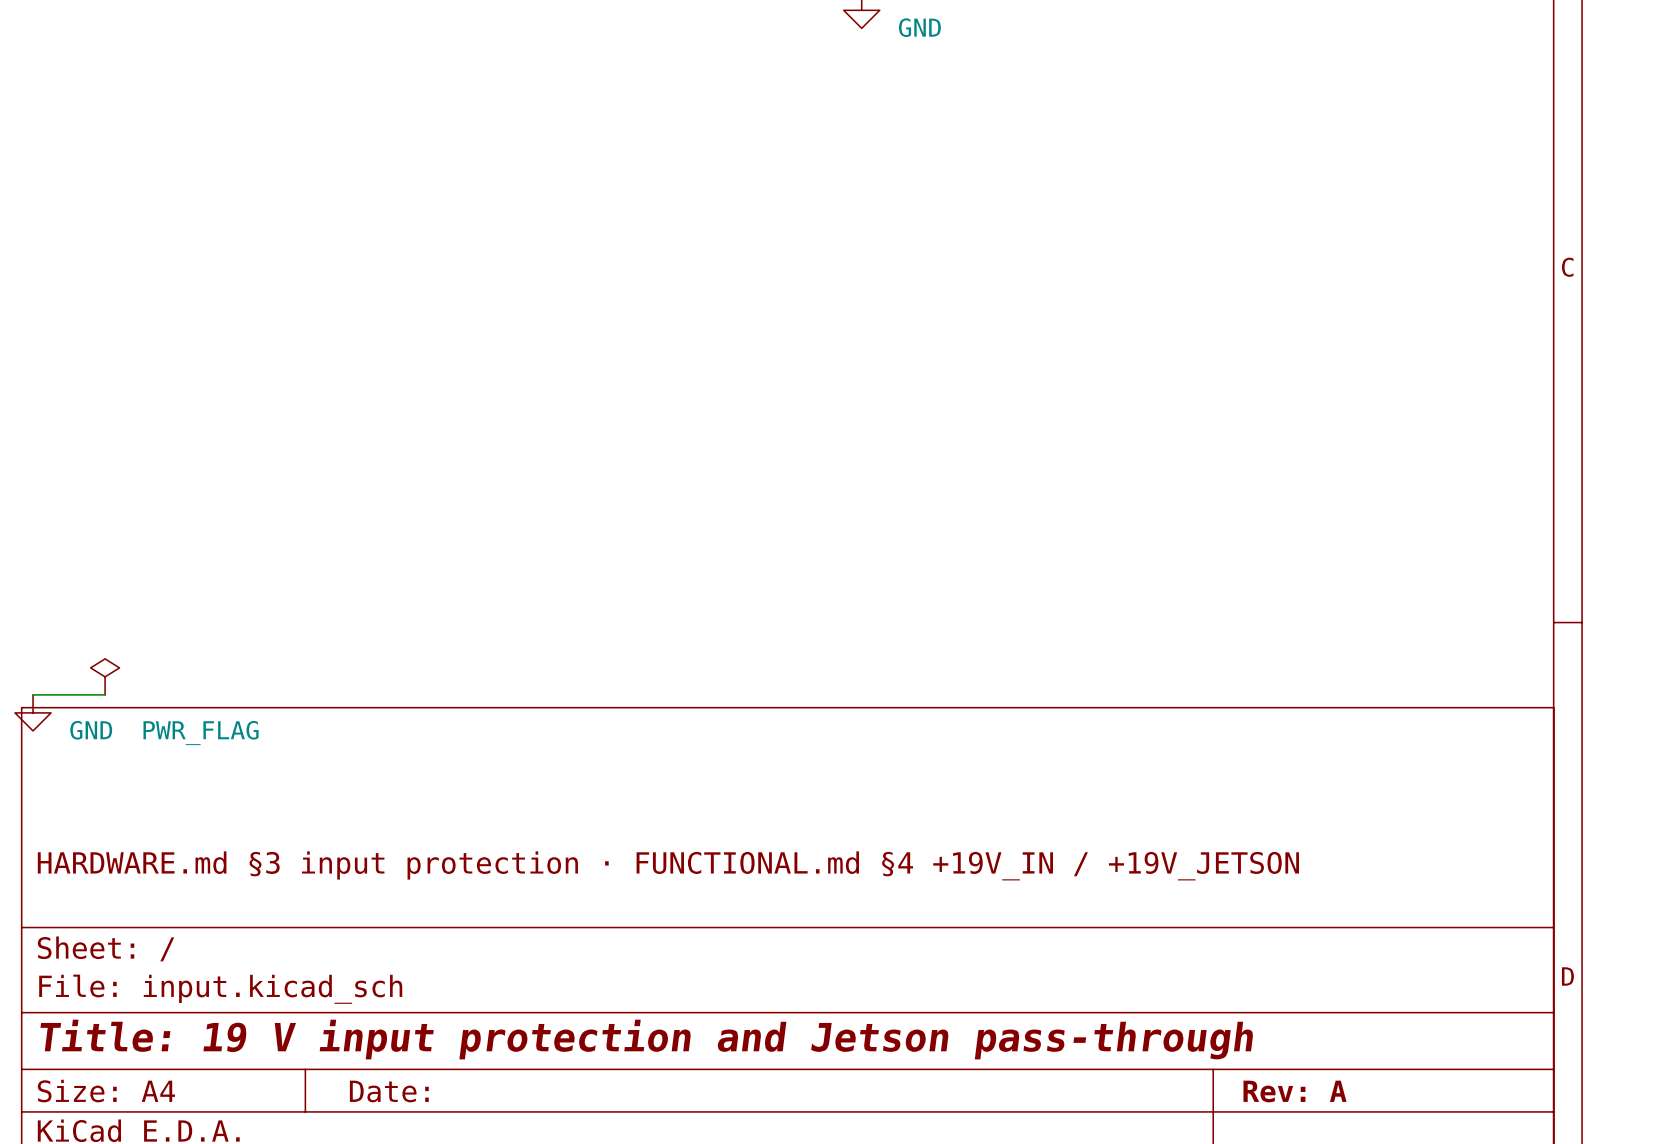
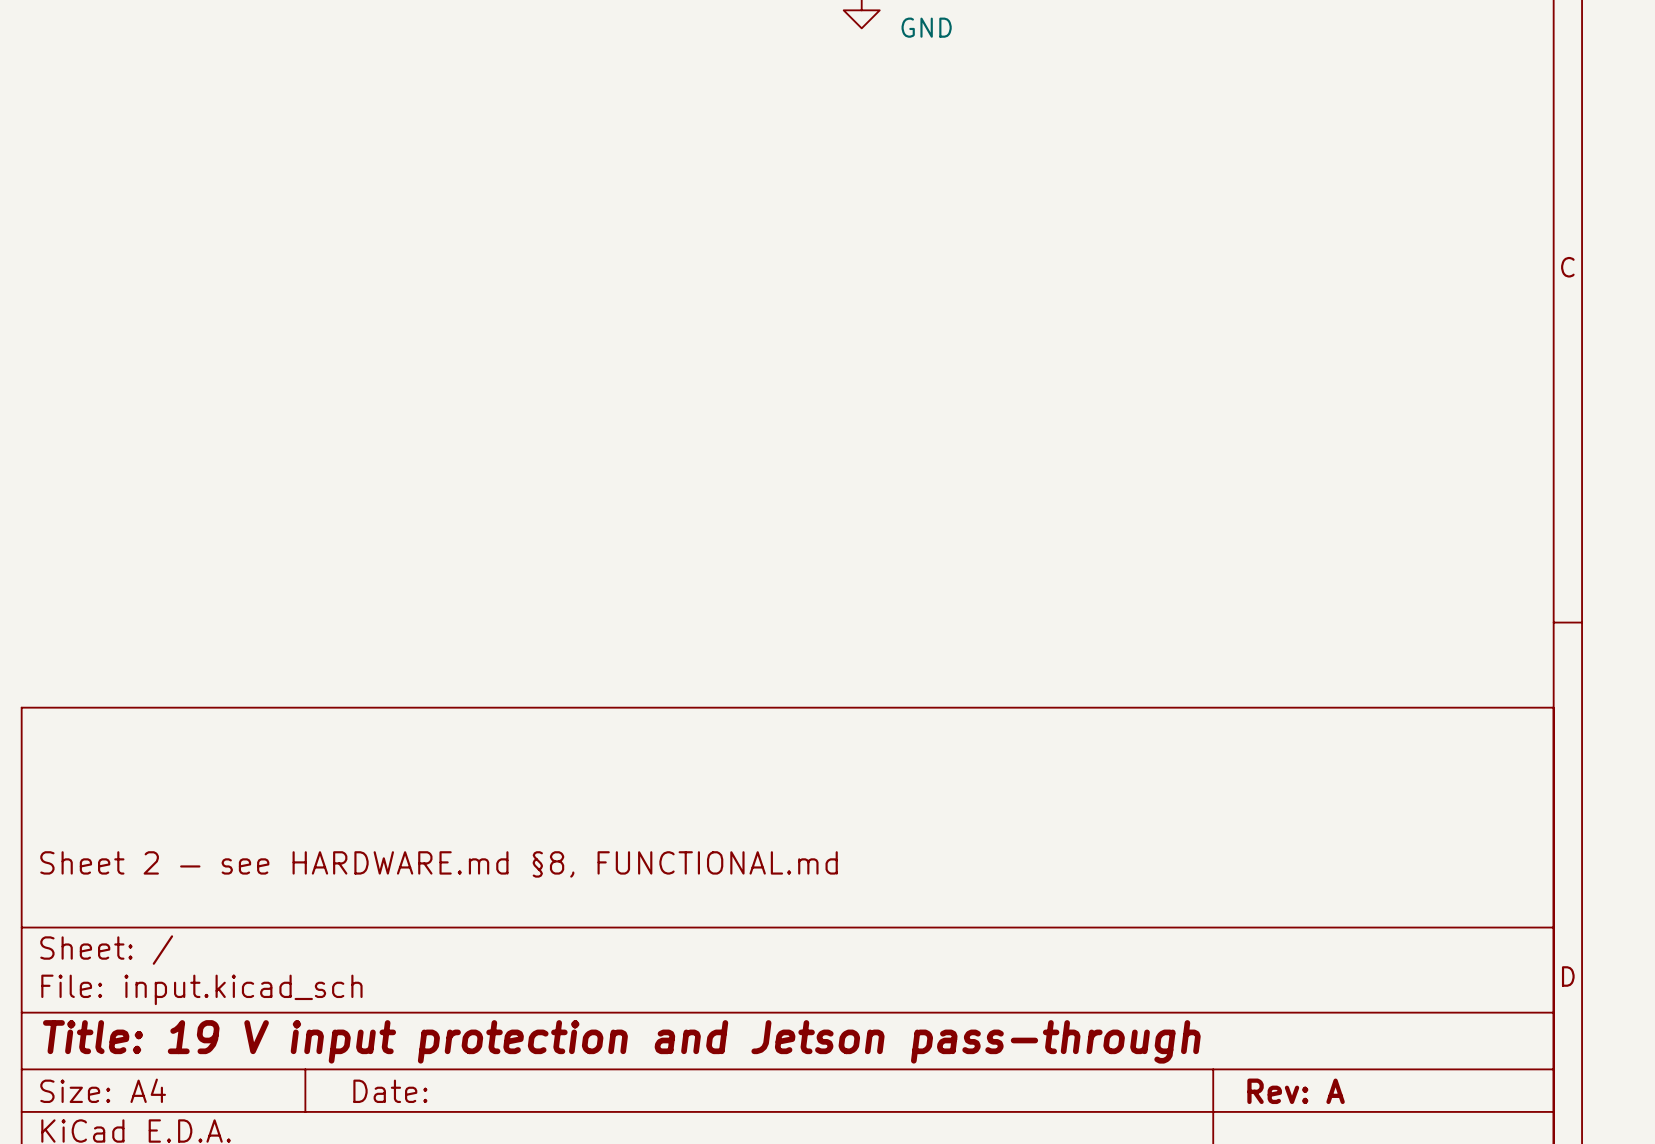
power symbol: PWR_FLAG (105, 676) -> none
wire: (33, 694) (105, 694) -> none
power symbol: GND (33, 712) -> none
title block: HARDWARE.md §3 input protection · FUNCTIONAL.md §4 +19V_IN / +19V_JETSON (668, 865) -> Sheet 2 — see HARDWARE.md §8, FUNCTIONAL.md (439, 864)

